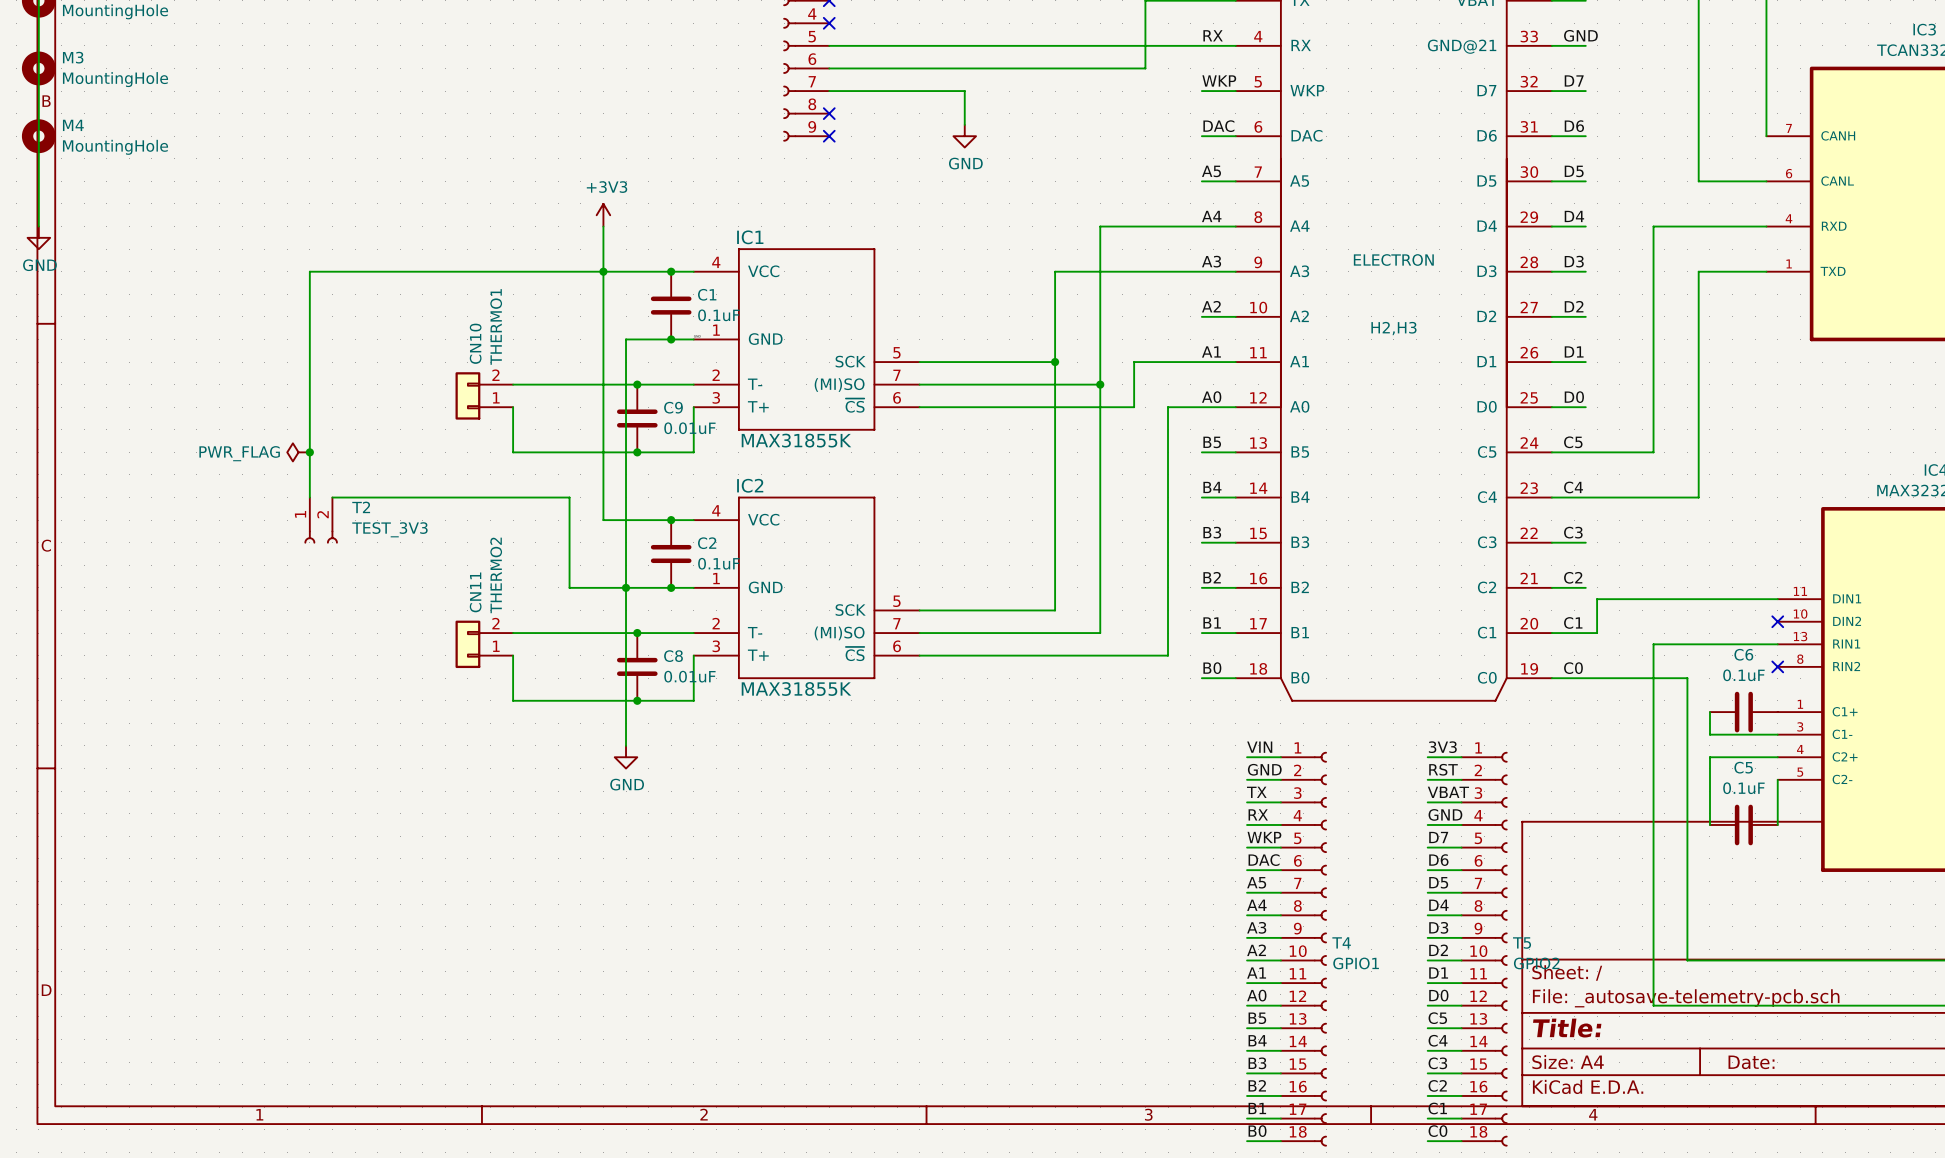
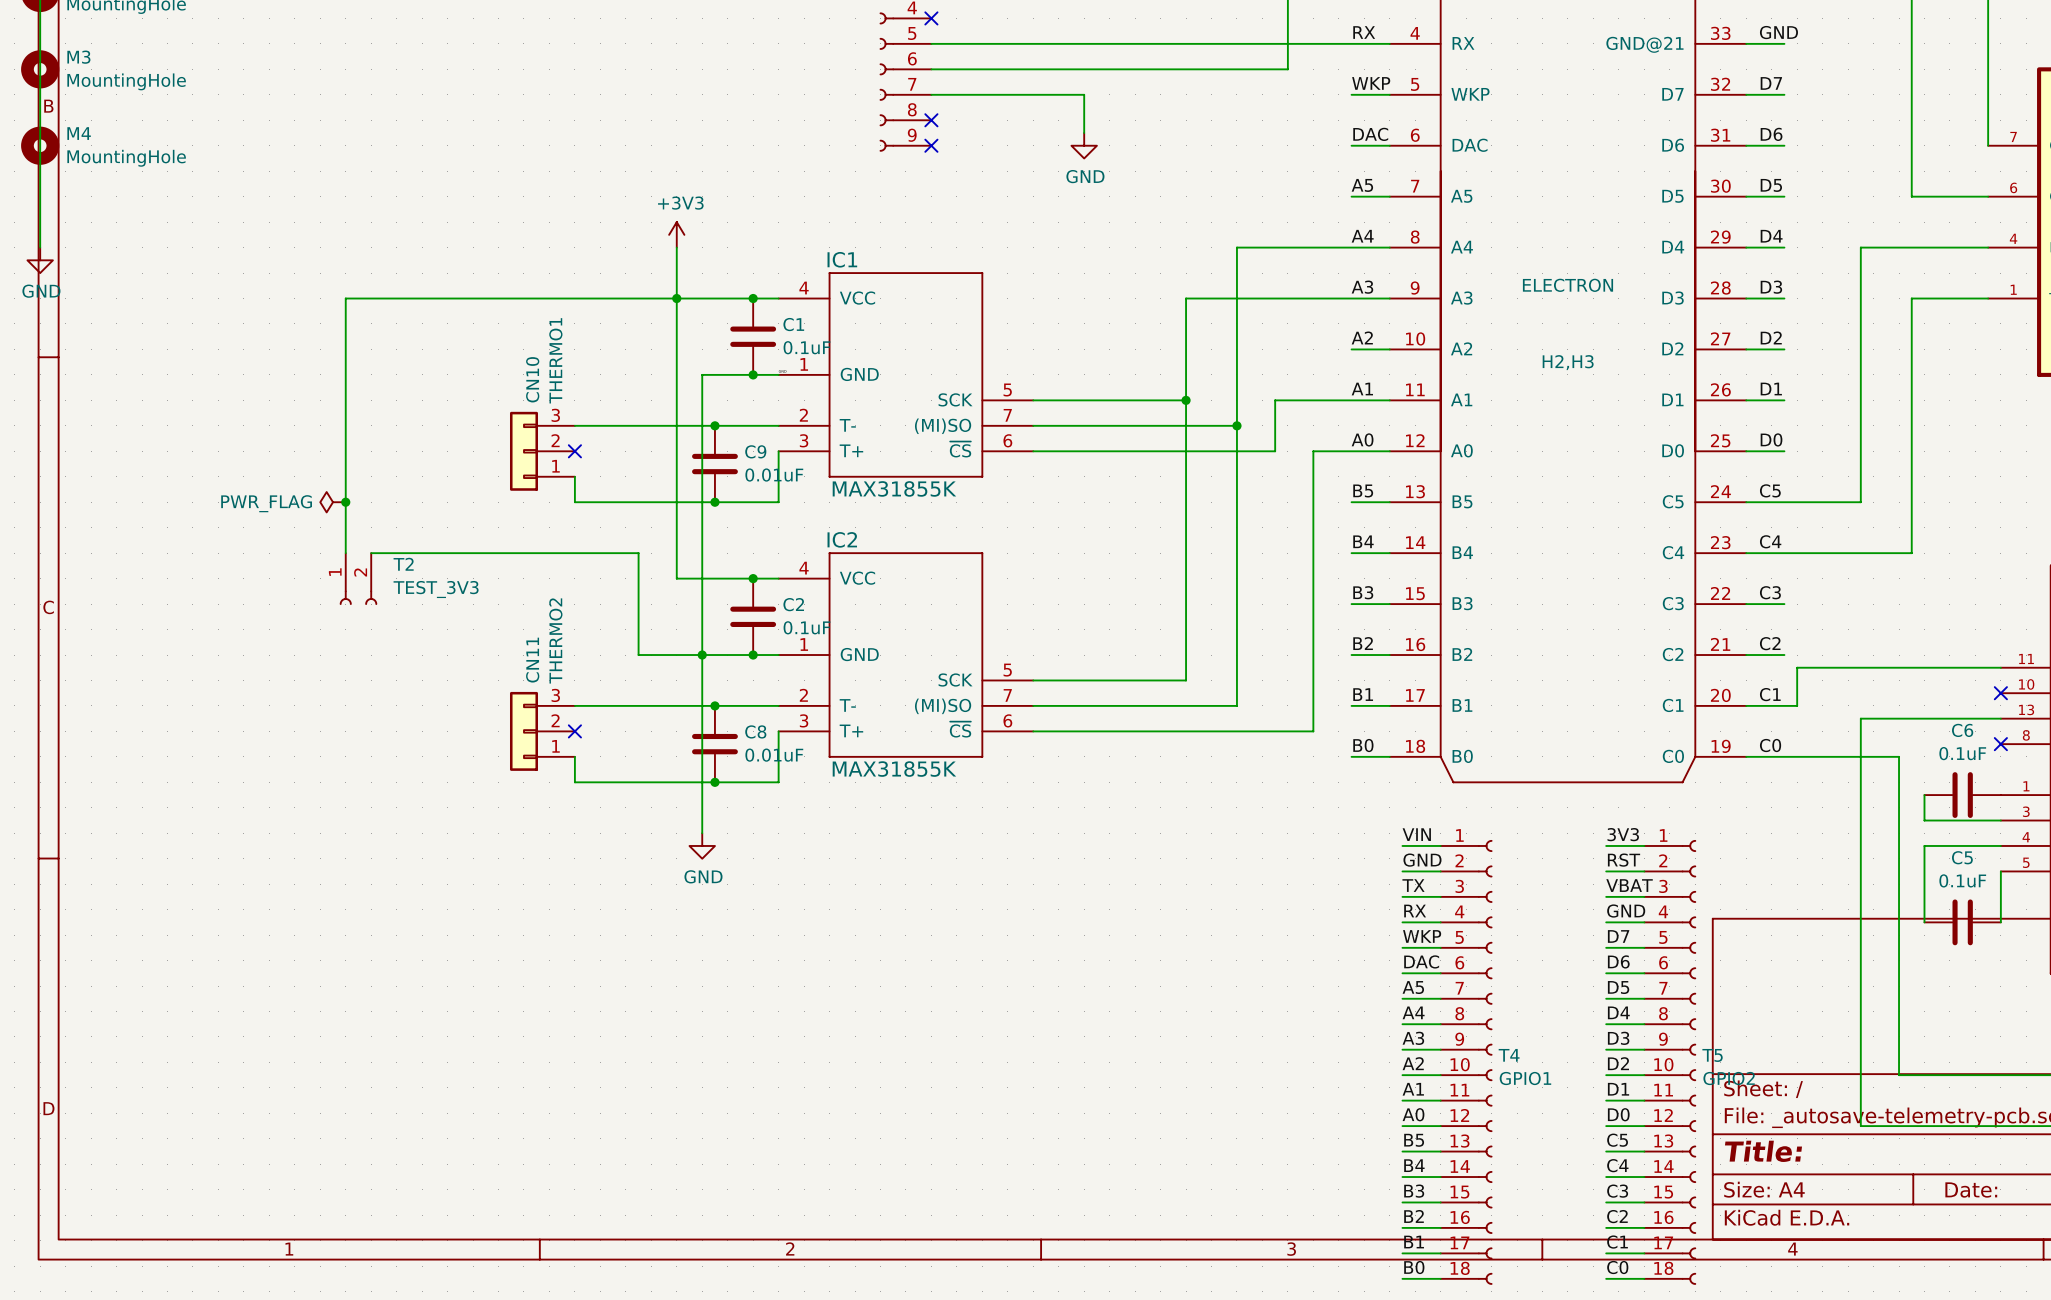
CN10 symbol: [455, 372, 514, 420] -> [509, 411, 575, 491]
wire: (513, 407) (513, 429) -> none
no-connect mark: none -> (574, 451)
CN11 symbol: [455, 620, 514, 669] -> [509, 691, 575, 771]
wire: (513, 655) (513, 678) -> none
no-connect mark: none -> (574, 731)

